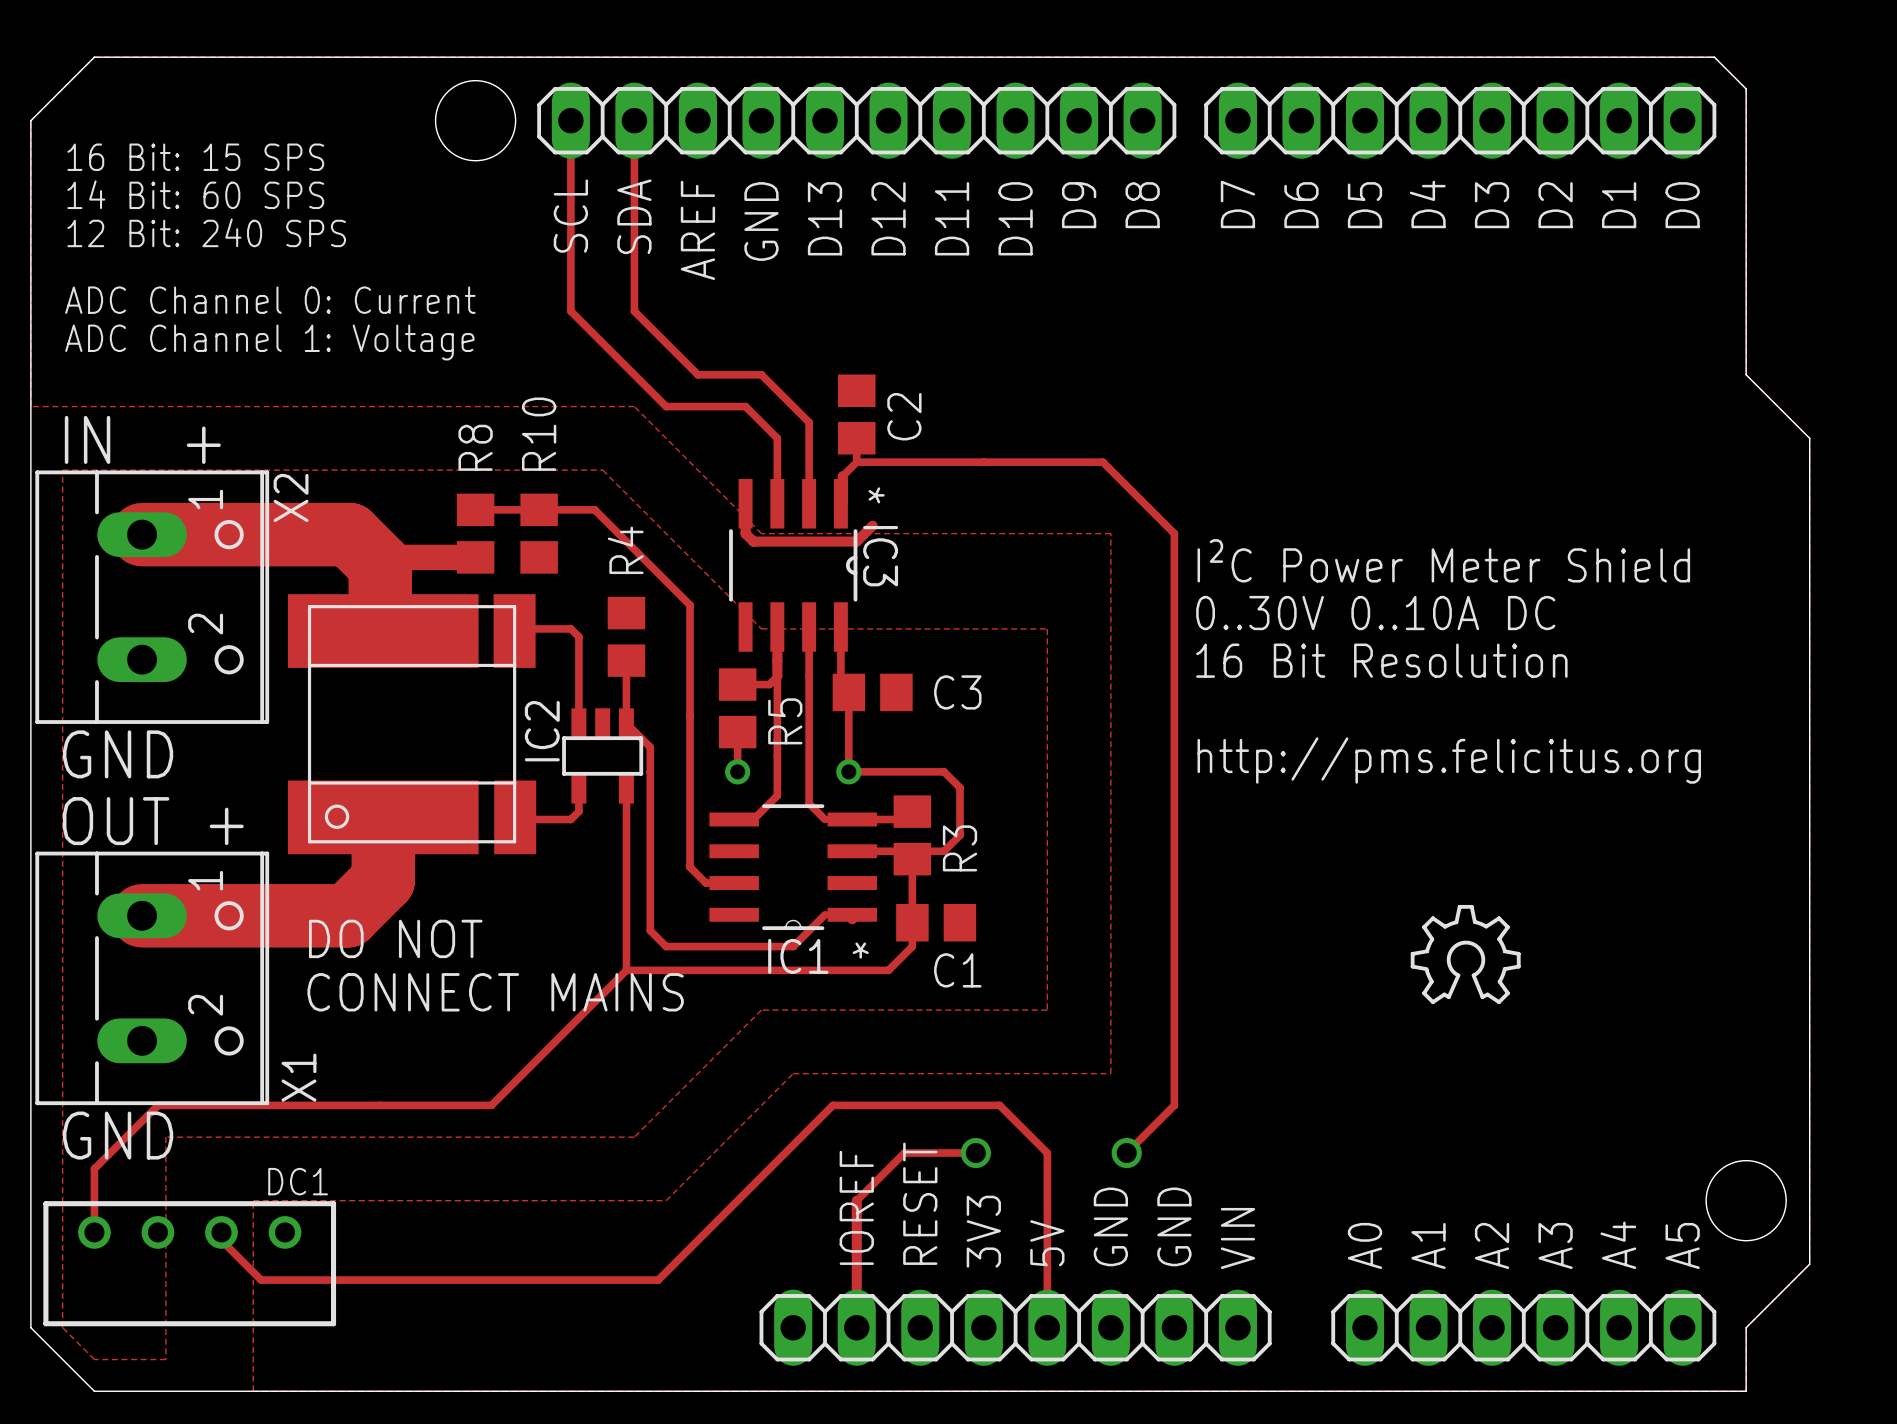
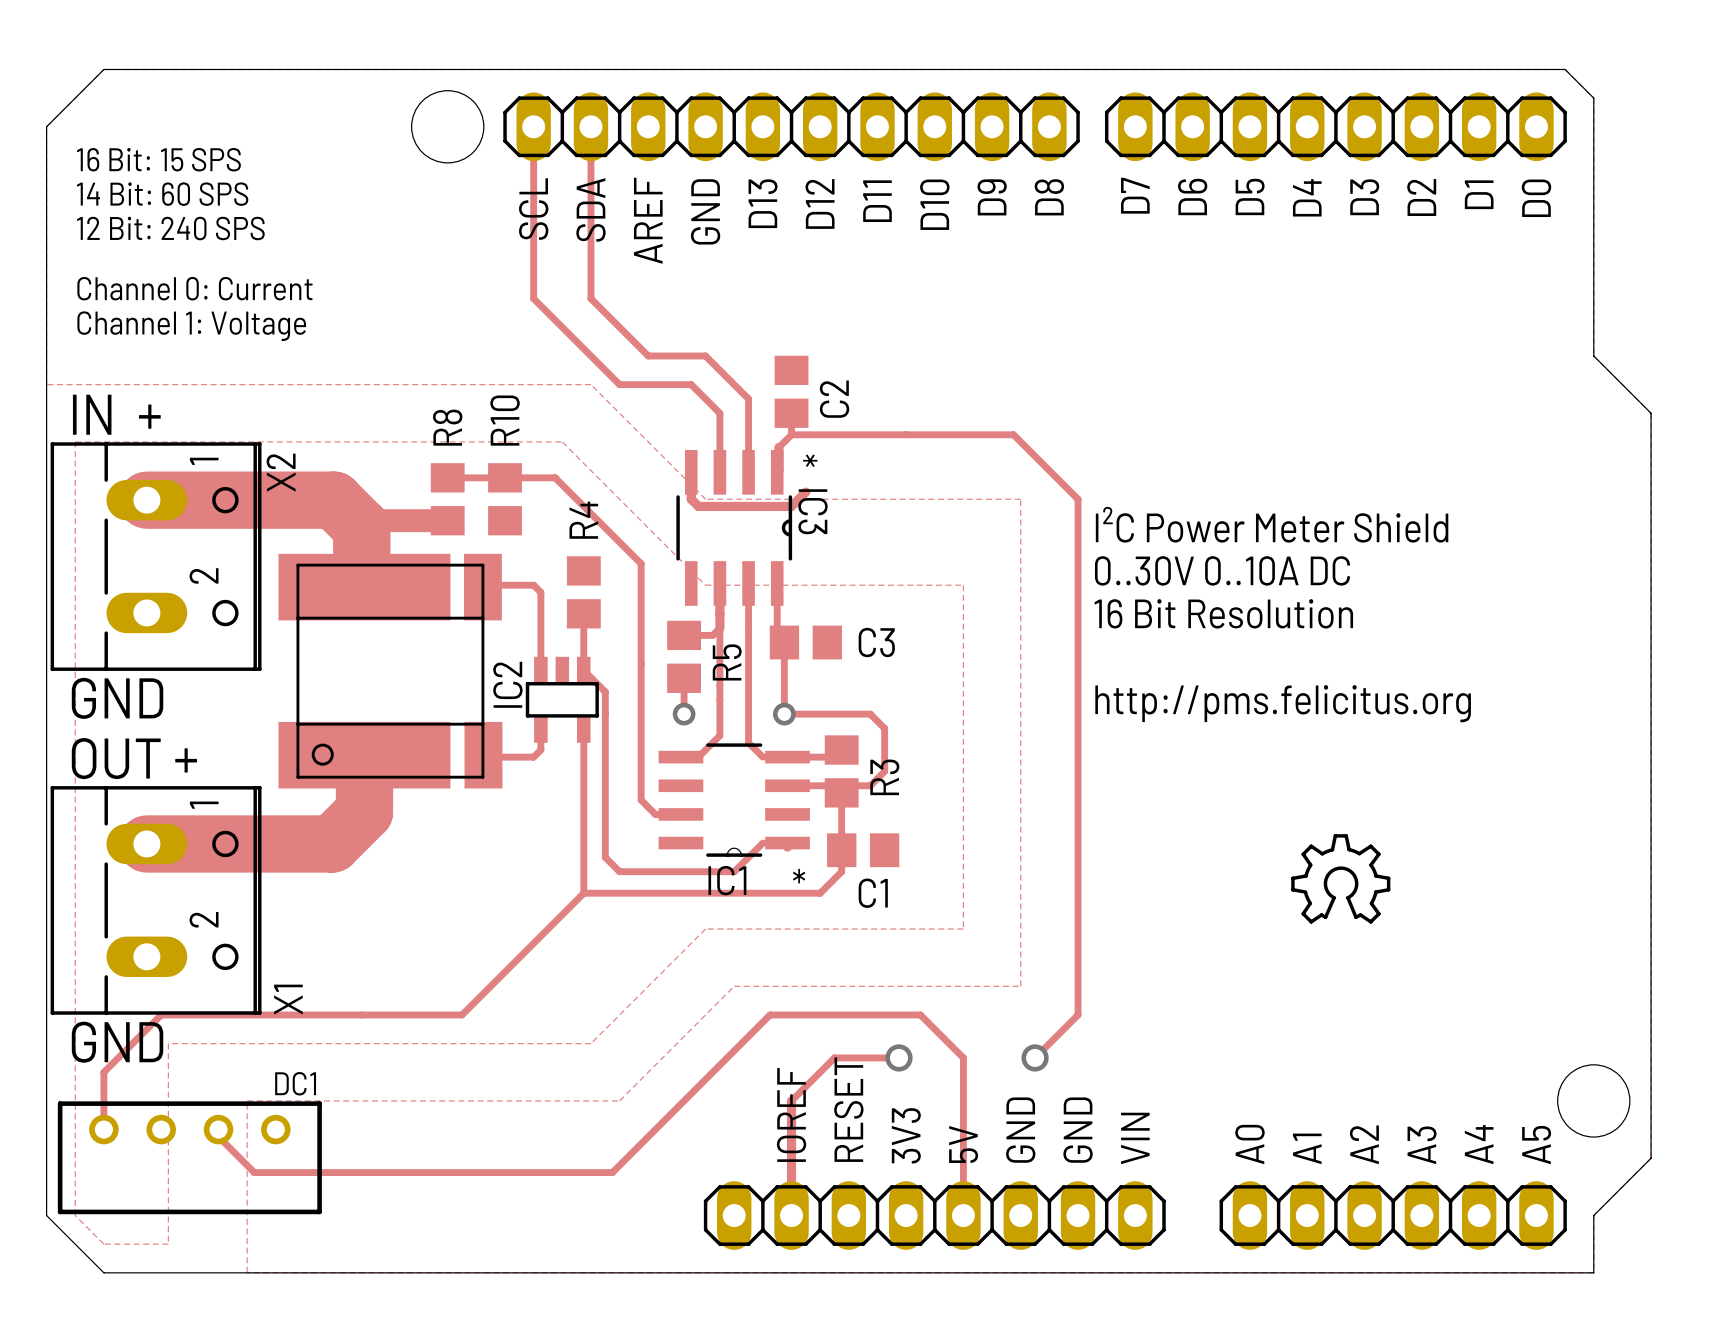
text: ADC Channel 0: Current (270, 300) -> Channel 0: Current (194, 288)
text: ADC Channel 1: Voltage (269, 342) -> Channel 1: Voltage (191, 326)
text: DO NOT (395, 938) -> none
text: CONNECT MAINS (495, 992) -> none

